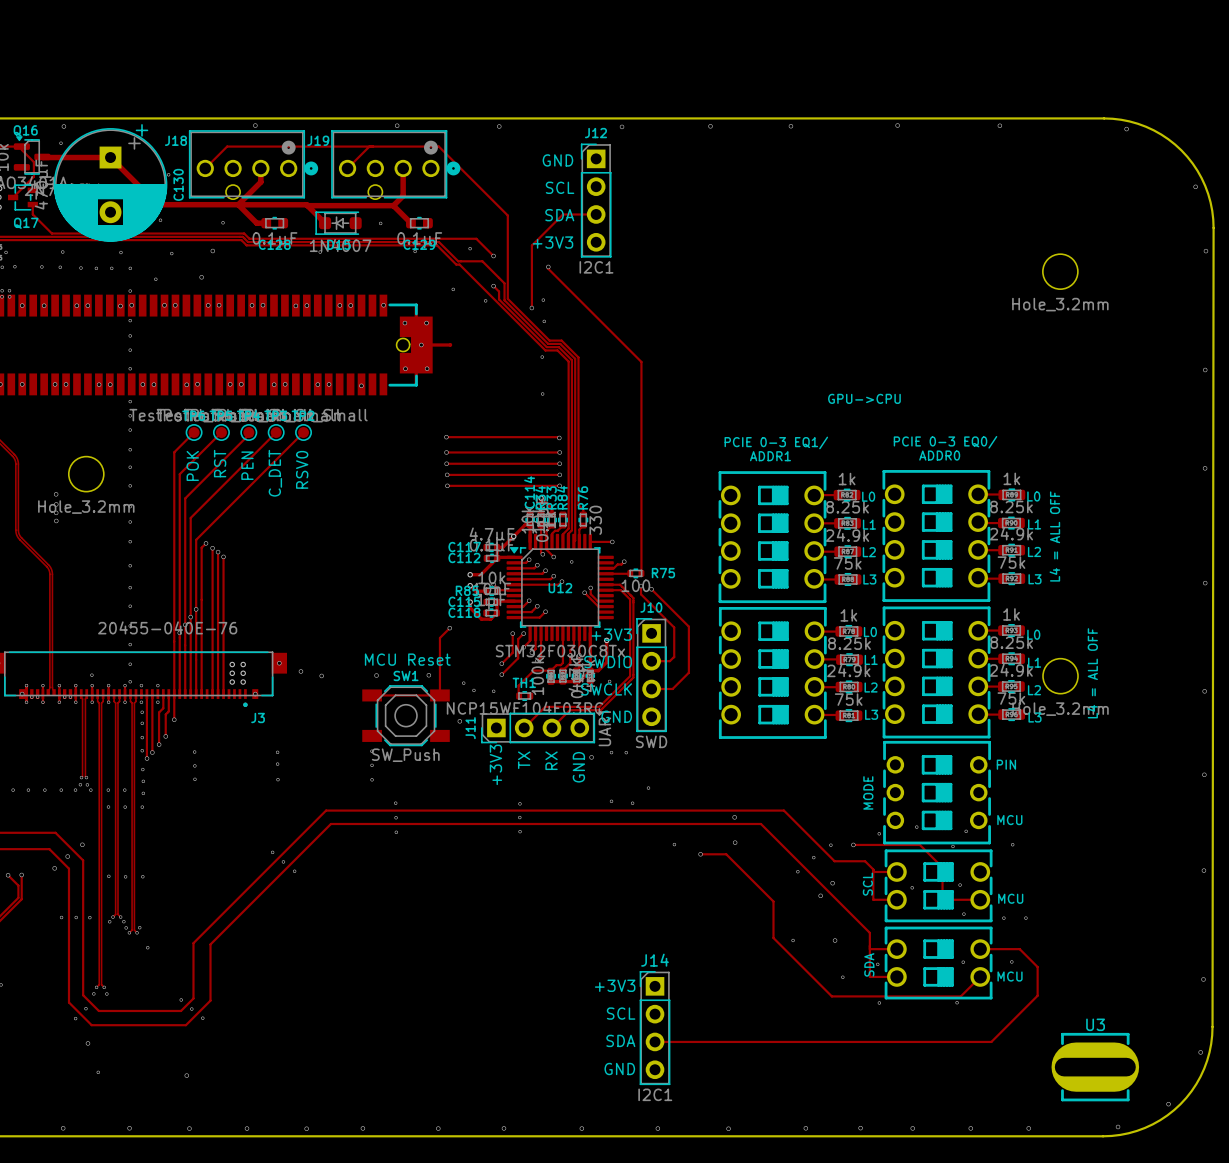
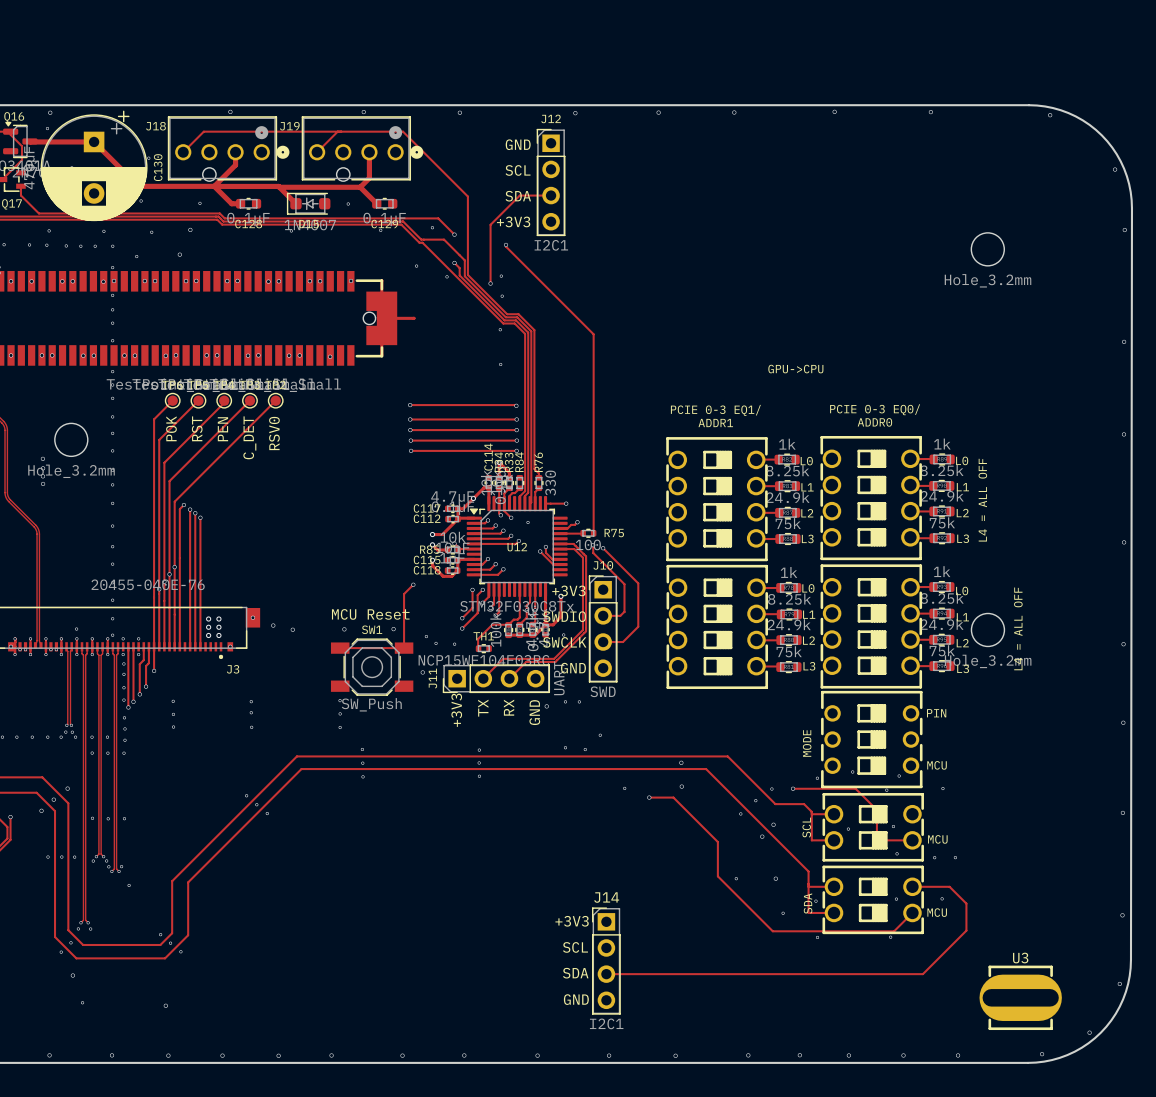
via: (404, 323) -> none
via: (426, 323) -> none
via: (421, 345) -> none
via: (405, 368) -> none
via: (427, 368) -> none

